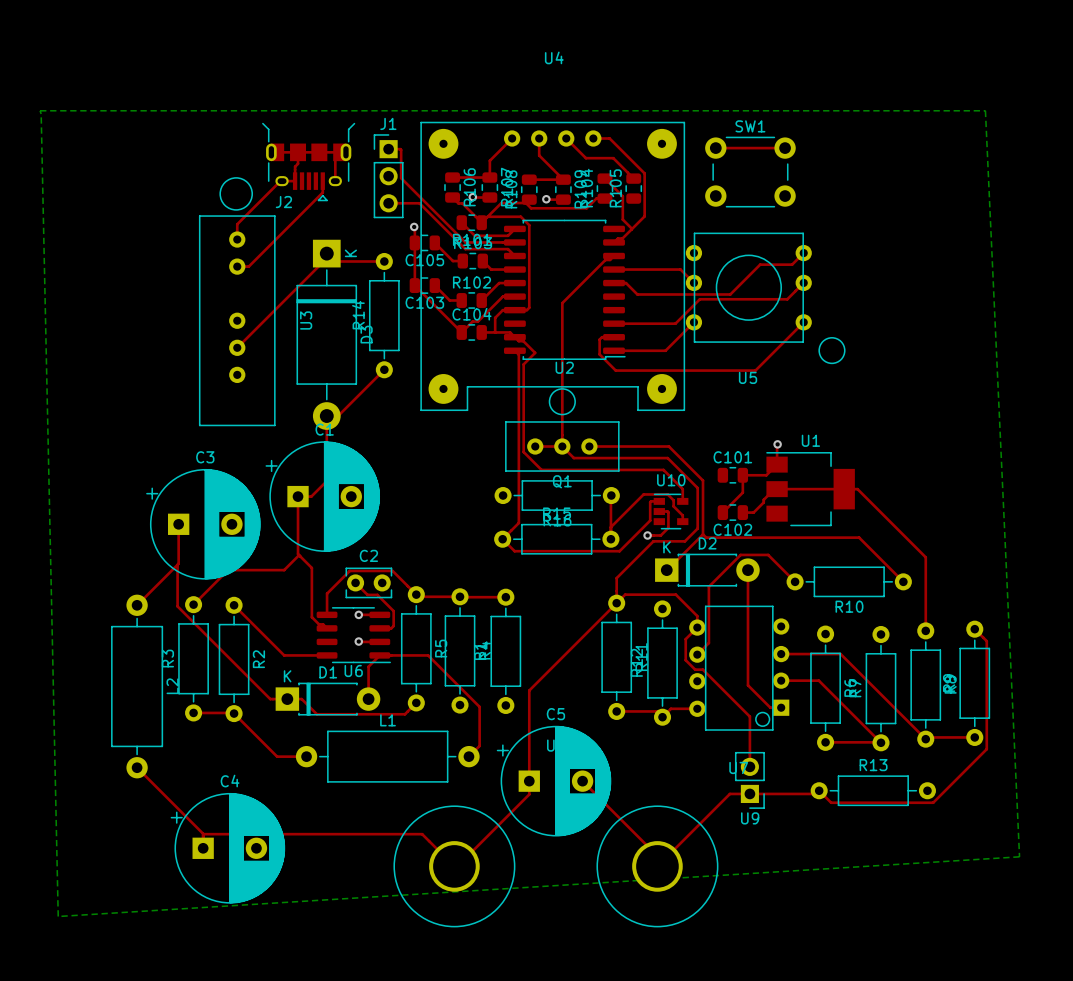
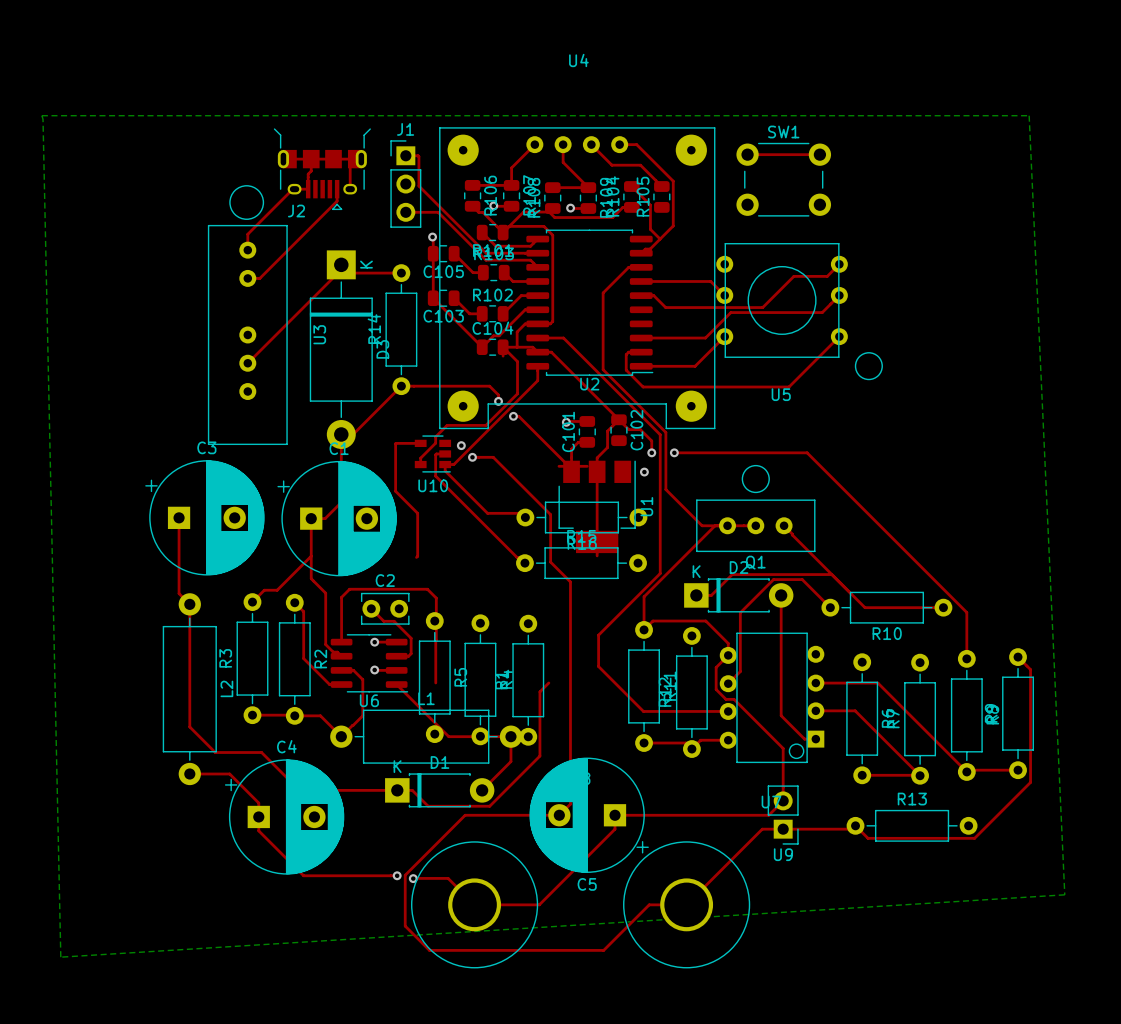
top track: (614, 256) (610, 259) (605, 259) (562, 303) (562, 446) (573, 458) (667, 458) (697, 488) (697, 528) (684, 541) (653, 541) (616, 578) -> (641, 267) (628, 267) (603, 292) (603, 369) (665, 432) (665, 489) (702, 525) (755, 525)
top track: none -> (537, 338) (563, 338) (660, 434) (660, 573) (598, 635) (598, 666) (643, 711) (728, 711)
top track: (514, 337) (518, 341) (523, 341) (535, 352) (523, 364) (523, 452) (541, 469) (663, 469) (682, 489) (682, 501) -> (537, 352) (551, 352) (628, 429) (640, 429) (651, 440) (651, 452)
top track: none -> (503, 356) (503, 347) (517, 361) (517, 393) (485, 425) (447, 425) (435, 436) (435, 443) (420, 458) (420, 464)
top track: (514, 350) (518, 354) (518, 523) (502, 539) (514, 551) (619, 551) (650, 520) (650, 502) (659, 501) -> (537, 366) (537, 380) (453, 464) (445, 464) (445, 470) (487, 513) (530, 513)
top track: none -> (401, 386) (489, 386) (498, 395) (498, 401)
via: none -> (498, 401)
top track: none -> (513, 416) (518, 416) (571, 469)
via: none -> (513, 416)
top track: none -> (618, 419) (607, 431) (607, 447) (597, 457) (597, 555)
top track: none -> (587, 421) (566, 422)
via: none -> (566, 422)
top track: none -> (587, 442) (578, 442) (571, 449) (571, 471)
top track: none -> (420, 443) (395, 443) (395, 491) (417, 513) (416, 557)
via: none -> (461, 445)
Q1 position: (562, 429) -> (755, 508)
via: none -> (651, 452)
via: none -> (674, 452)
top track: none -> (445, 453) (435, 454) (435, 476) (517, 557) (529, 557)
via: none -> (472, 457)
top track: (777, 444) (777, 464) (766, 475) (742, 475) (742, 492) (722, 512) (721, 511) -> none
via: (777, 444) -> none
top track: (589, 446) (668, 446) (703, 480) (703, 534) -> none
via: none -> (644, 472)
C101 name position: C101 (732, 457) -> C101 (568, 431)
C101 rotation: 0° (732, 475) -> 90° clockwise (587, 431)
C101 position: (732, 475) -> (587, 431)
U1 rotation: 0° (810, 489) -> 90° clockwise (597, 506)
U1 position: (810, 489) -> (597, 506)
top track: none -> (179, 517) (179, 593) (189, 604) (189, 726) (215, 752) (261, 752) (299, 790) (412, 790) (428, 806) (489, 806) (539, 756) (539, 691) (548, 682)
top track: (611, 495) (610, 539) -> none
top track: none -> (715, 525) (644, 596) (644, 603)
top track: (659, 511) (668, 512) (668, 527) (660, 535) (647, 535) -> none
U10 rotation: 0° (671, 511) -> 180° (432, 453)
U10 position: (671, 511) -> (432, 453)
C102 rotation: 0° (732, 512) -> 90° clockwise (618, 430)
C102 position: (732, 512) -> (618, 430)
top track: (742, 512) (753, 512) (774, 489) (857, 489) (925, 557) (925, 586) -> (674, 452) (807, 452) (966, 612)
top track: (682, 521) (682, 515) (673, 506) (673, 500) (667, 494) (643, 494) (610, 527) -> none
top track: (178, 524) (178, 563) (137, 605) -> none
C3 position: (203, 524) -> (204, 517)
C102 name position: C102 (732, 529) -> C102 (636, 430)
top track: none -> (311, 556) (277, 590) (264, 590) (252, 602)
top track: (703, 534) (706, 537) (859, 537) (903, 581) -> (784, 525) (865, 607) (943, 607)
top track: (703, 534) (667, 570) -> (831, 574) (732, 574) (711, 595) (696, 595)
via: (647, 535) -> none
top track: (299, 555) (284, 570) (228, 570) (193, 604) -> none
top track: (177, 564) (177, 606) (270, 699) (301, 699) (316, 714) (404, 714) (416, 702) -> none
top track: (327, 593) (349, 570) (392, 570) (418, 596) (505, 597) -> (341, 620) (341, 597) (349, 589) (427, 589) (436, 598) (435, 682)
top track: (616, 603) (529, 690) (529, 794) (457, 866) -> (783, 800) (768, 815) (615, 815) (615, 829) (539, 904) (477, 904)
top track: (234, 605) (284, 655) (315, 655) -> (294, 602) (303, 611) (303, 658) (329, 684)
top track: none -> (341, 670) (353, 670) (362, 679) (362, 715) (341, 736) (320, 715) (252, 715)
top track: none -> (396, 684) (448, 736) (510, 736) (510, 761) (482, 790)
R3 position: (193, 658) -> (252, 658)
R2 position: (234, 659) -> (294, 659)
L2 position: (137, 686) -> (189, 689)
D1 position: (327, 699) -> (439, 790)
top track: (368, 699) (368, 666) (379, 655) (428, 655) (479, 706) (479, 745) (468, 756) -> none
top track: (193, 712) (233, 712) (277, 756) (306, 756) -> none
top track: none -> (189, 773) (229, 773) (258, 803) (258, 830) (303, 875) (397, 875)
L1 position: (387, 756) -> (426, 736)
top track: (137, 767) (203, 833) (203, 848) -> none
C5 rotation: 0° (554, 781) -> 180° (589, 815)
top track: (582, 781) (657, 856) (657, 866) -> (472, 457) (493, 457) (550, 514) (550, 562) (570, 581) (570, 804) (559, 815) (465, 815) (405, 875) (405, 926) (429, 950) (603, 950) (649, 904) (686, 904)
top track: (203, 834) (422, 834) (429, 841) -> (413, 878) (448, 878)
via: none -> (397, 875)
via: none -> (413, 878)
C4 position: (227, 848) -> (284, 816)

